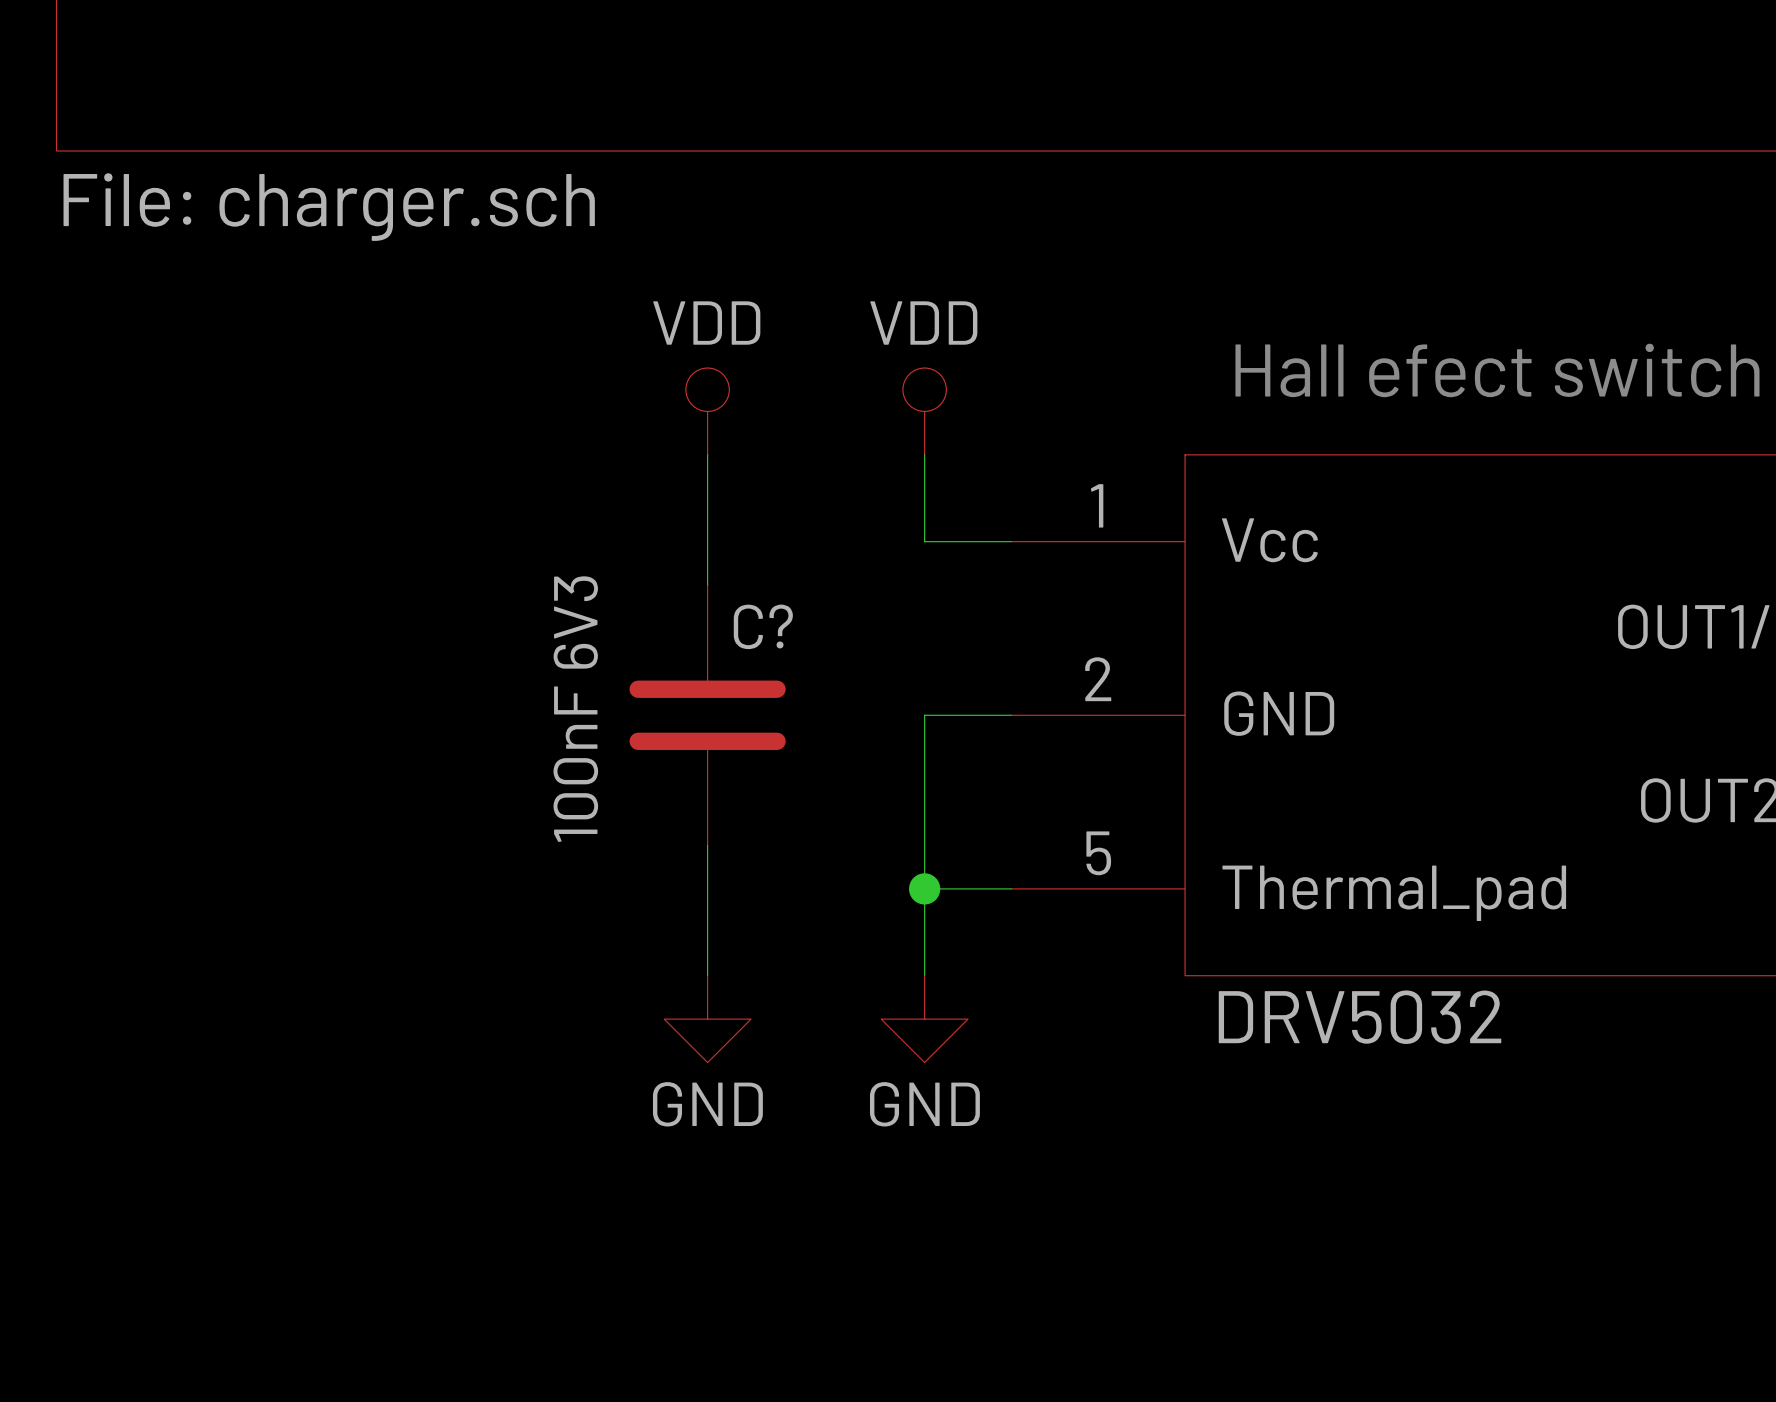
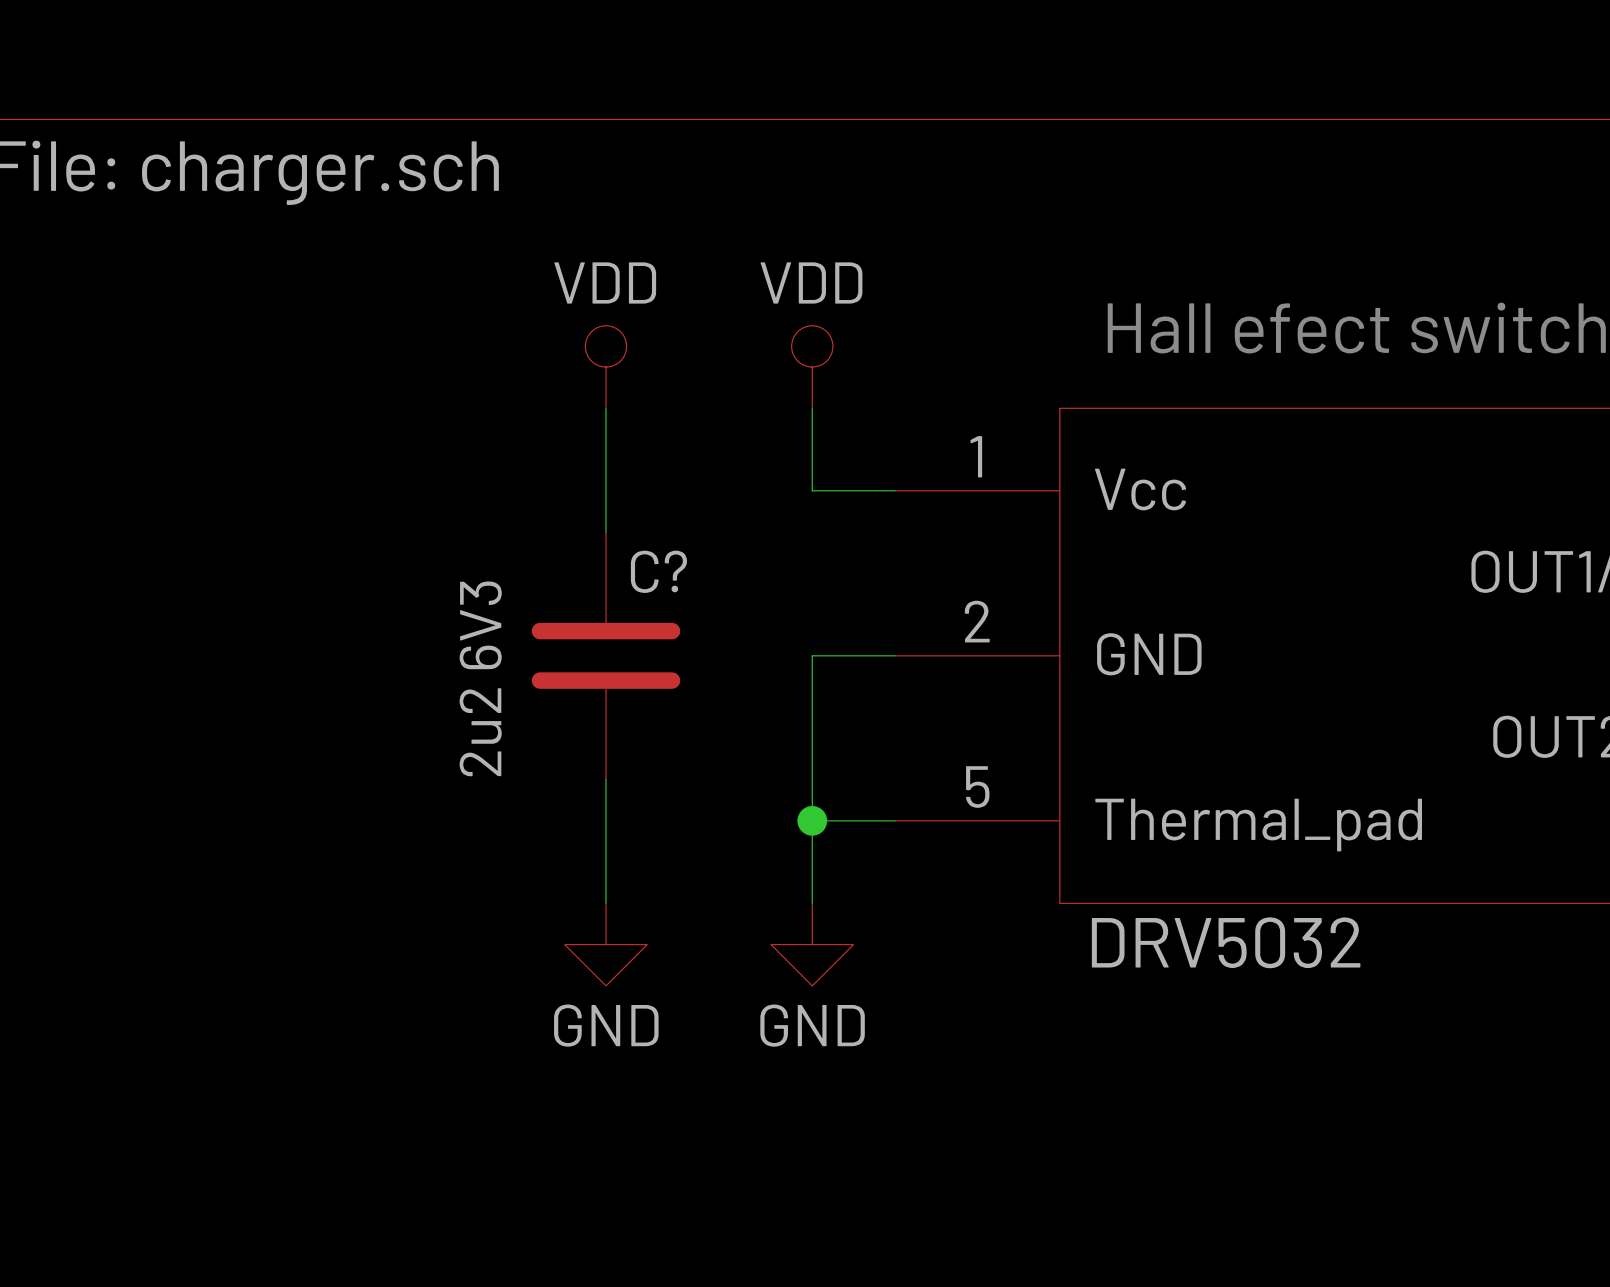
C? value: 100nF 6V3 (575, 709) -> 2u2 6V3 (480, 678)

